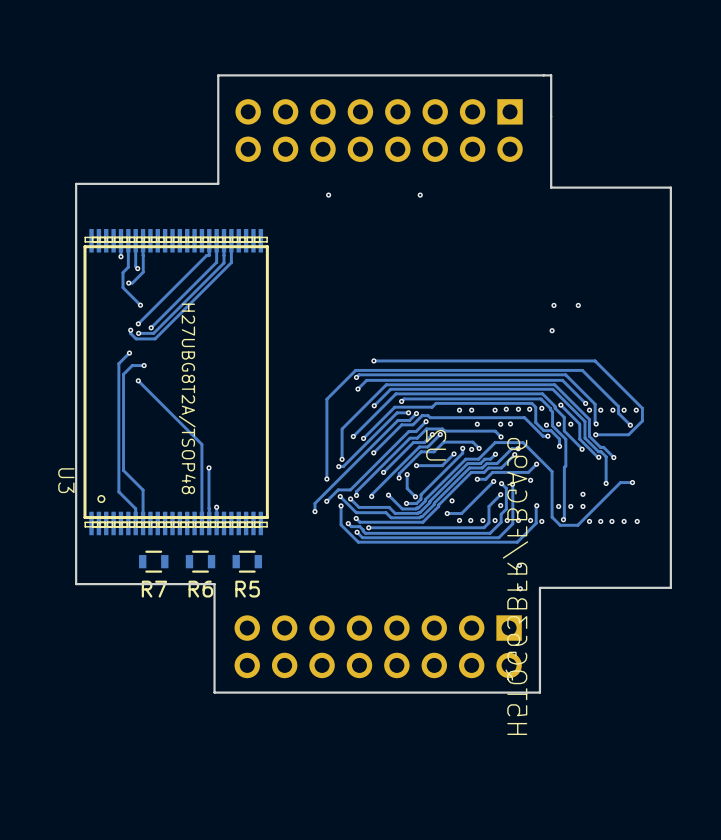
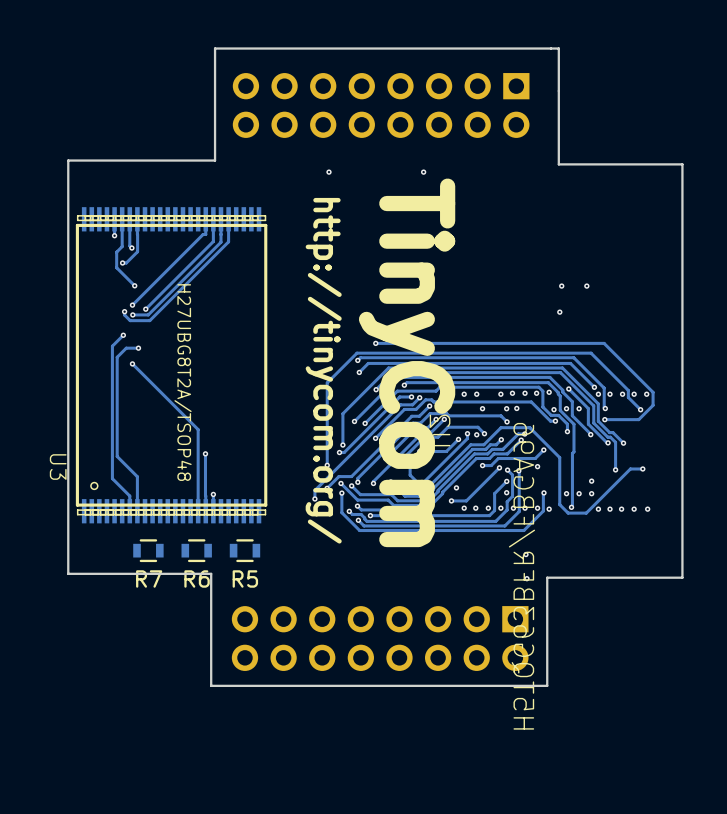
text: none -> TinyCom (407, 362)
text: none -> http://tinycom.org/ (323, 370)

